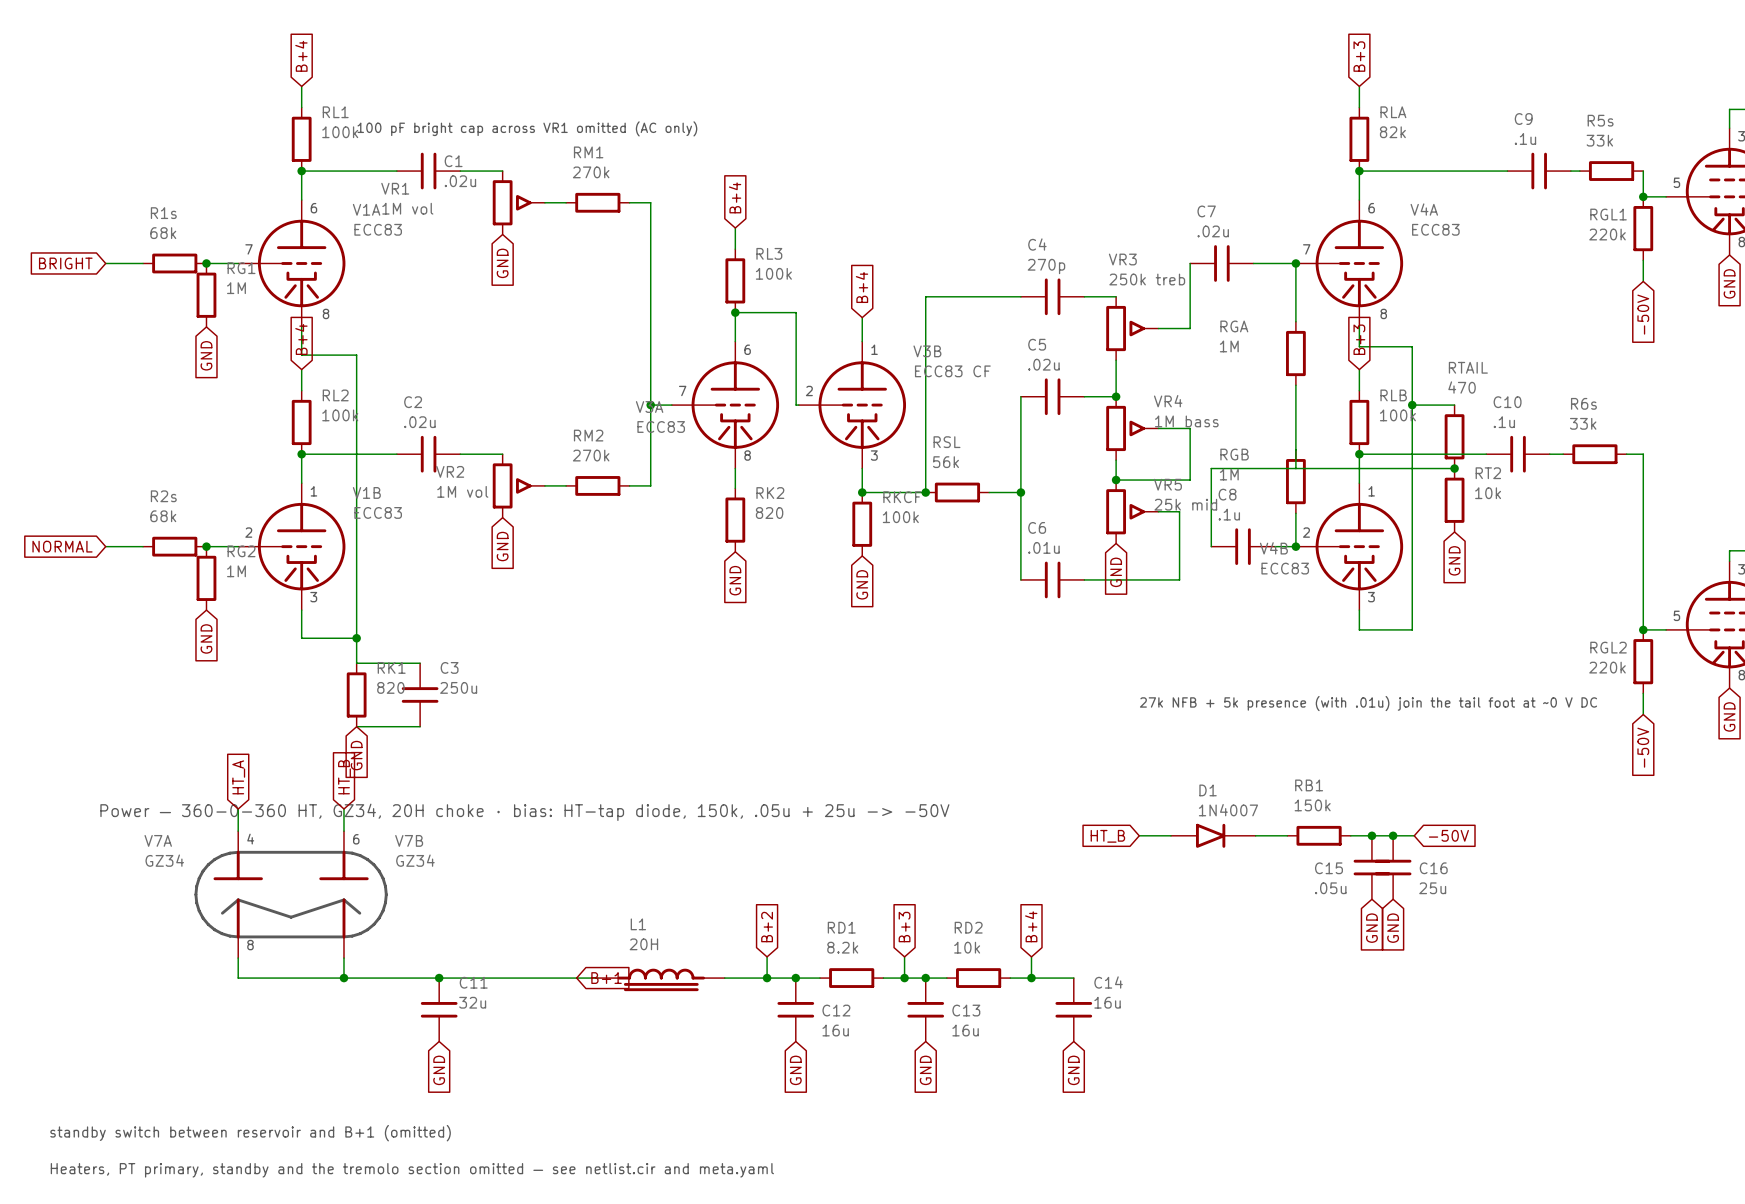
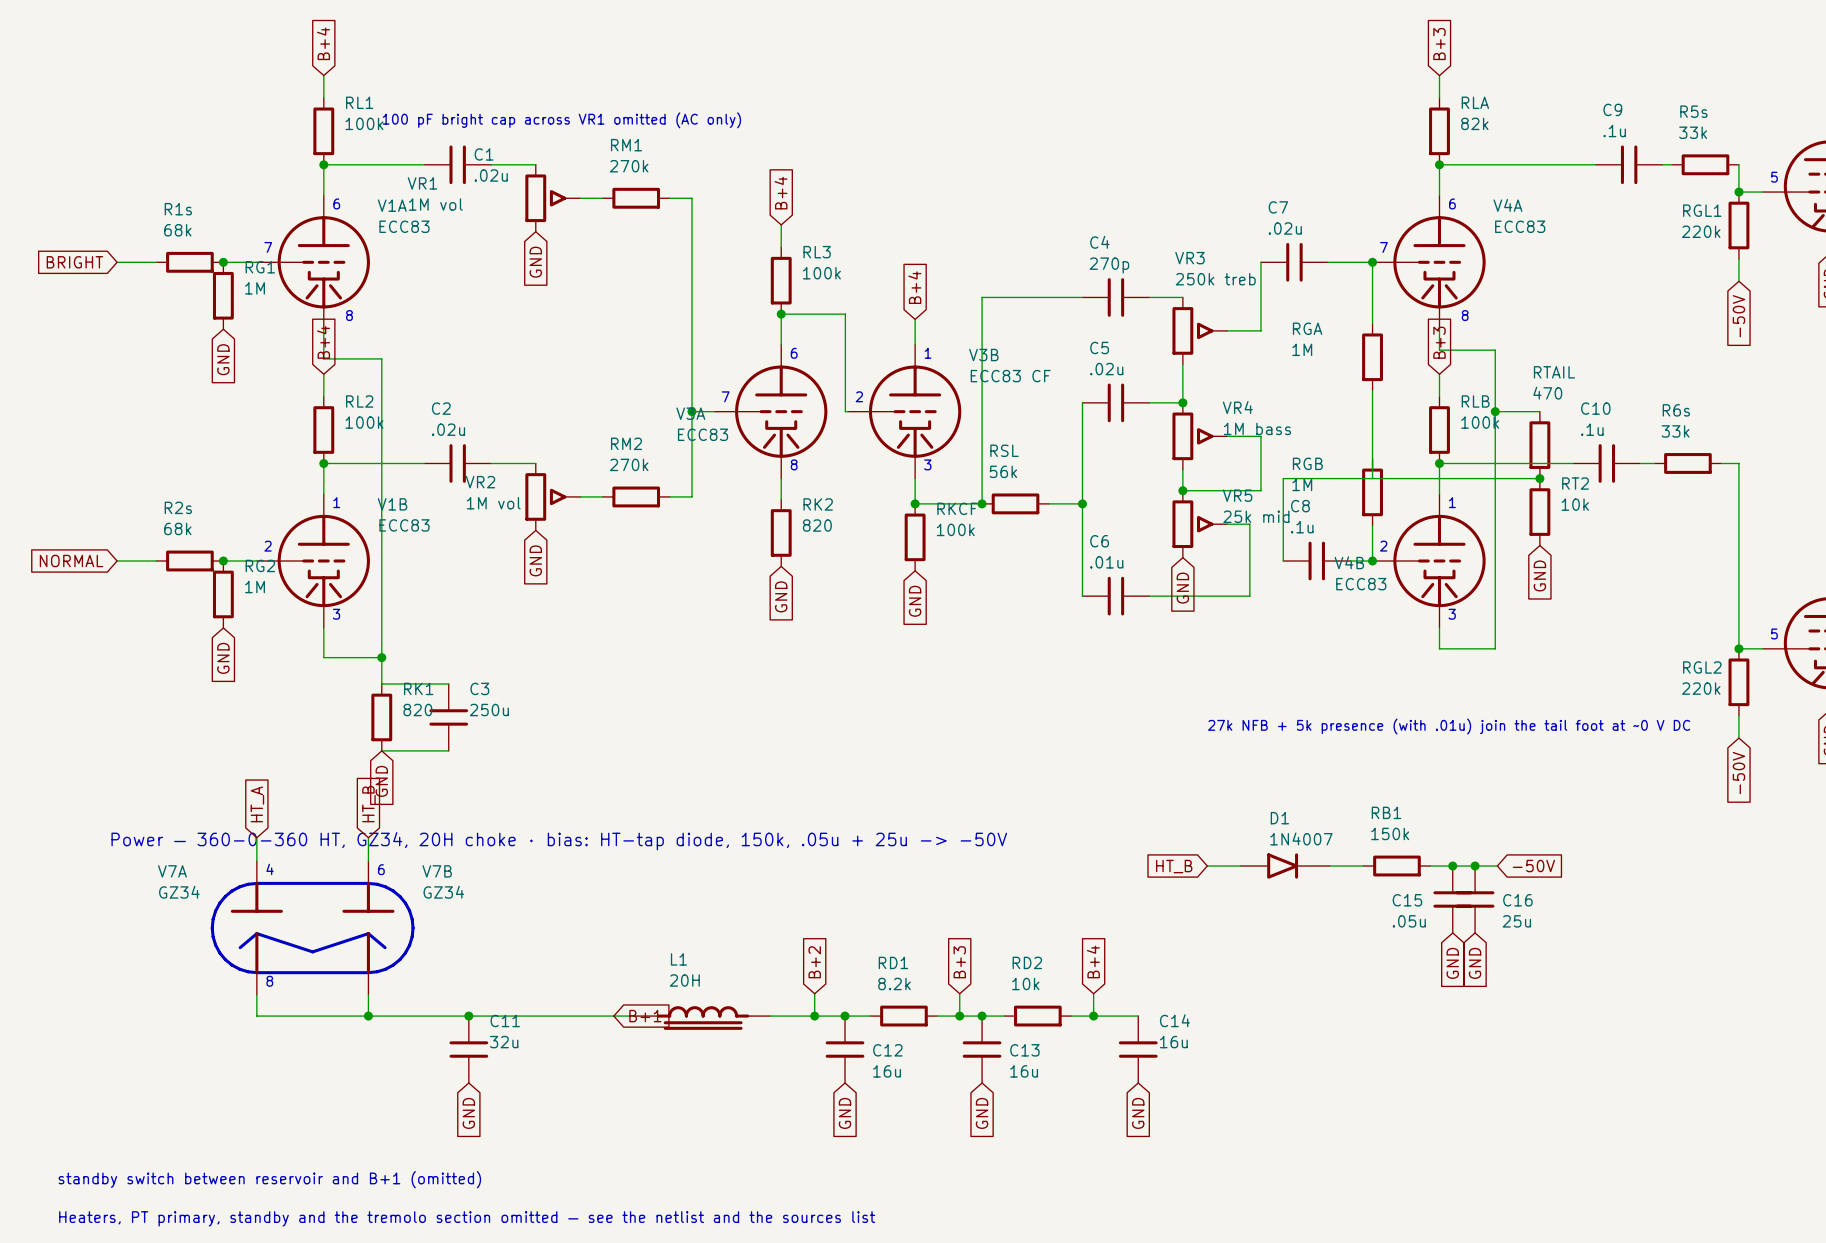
text: Heaters, PT primary, standby and the tremolo section omitted — see netlist.cir and meta.yaml (412, 1170) -> Heaters, PT primary, standby and the tremolo section omitted — see the netlist and the sources list (467, 1218)

